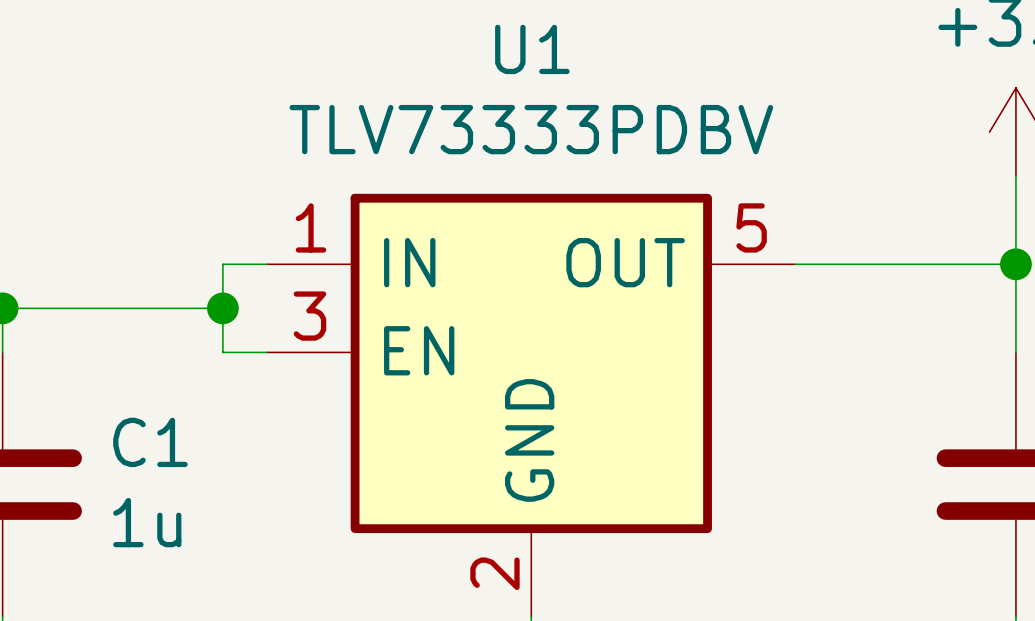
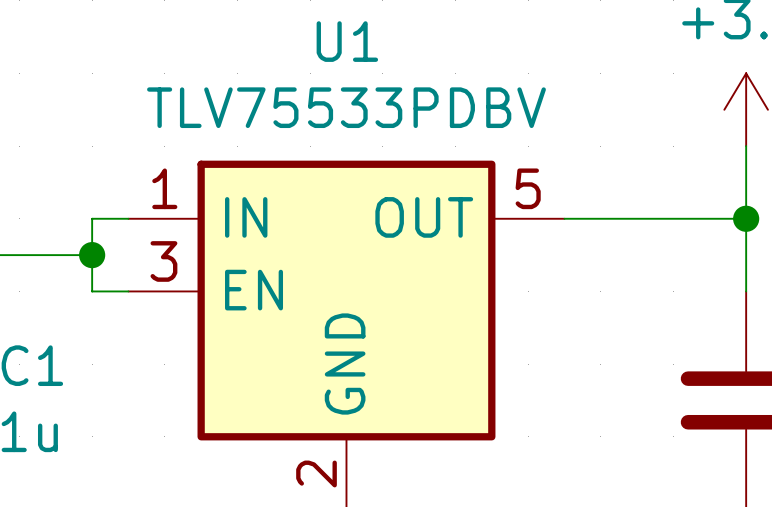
U1 value: TLV73333PDBV (531, 129) -> TLV75533PDBV (346, 107)

